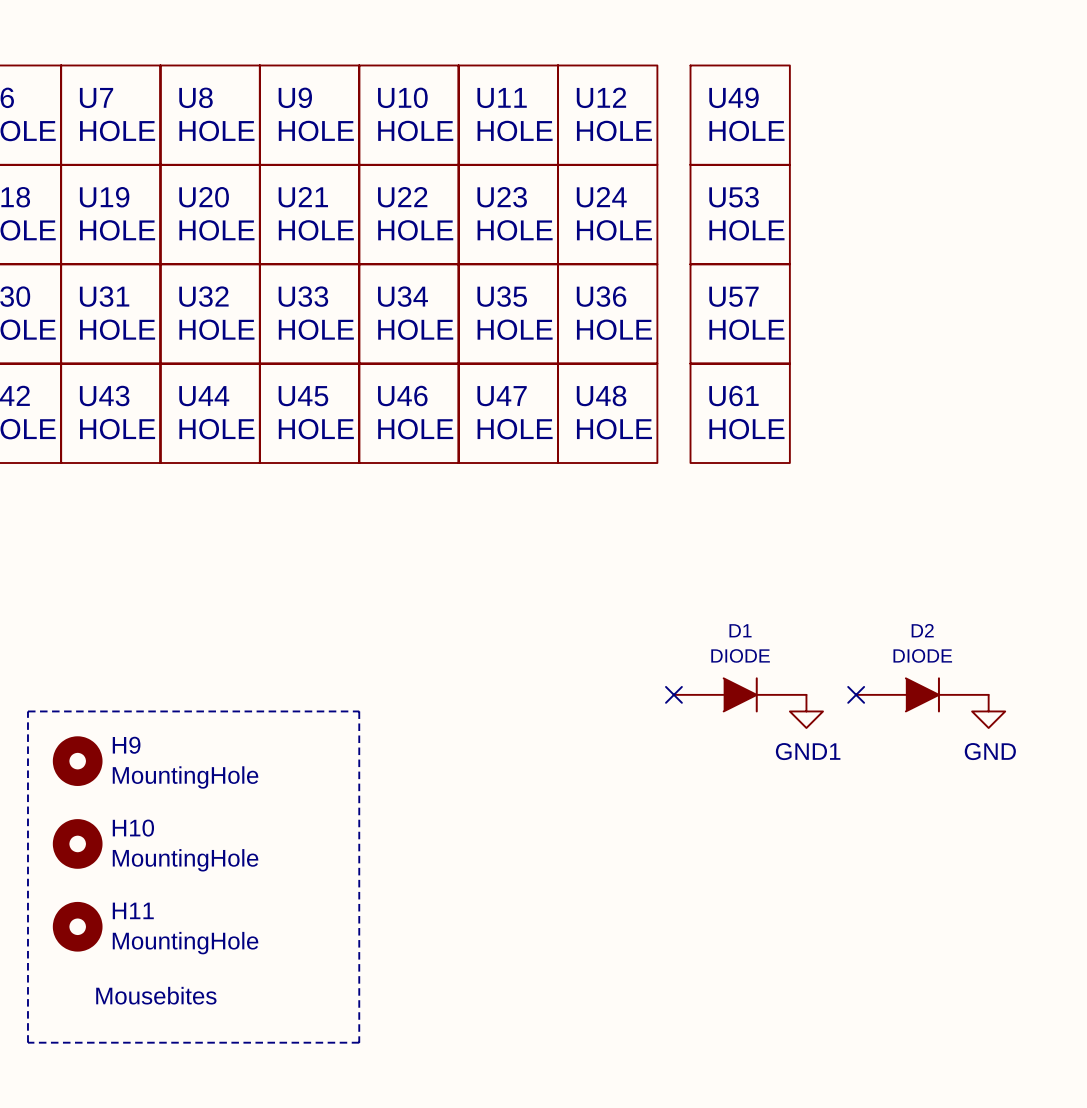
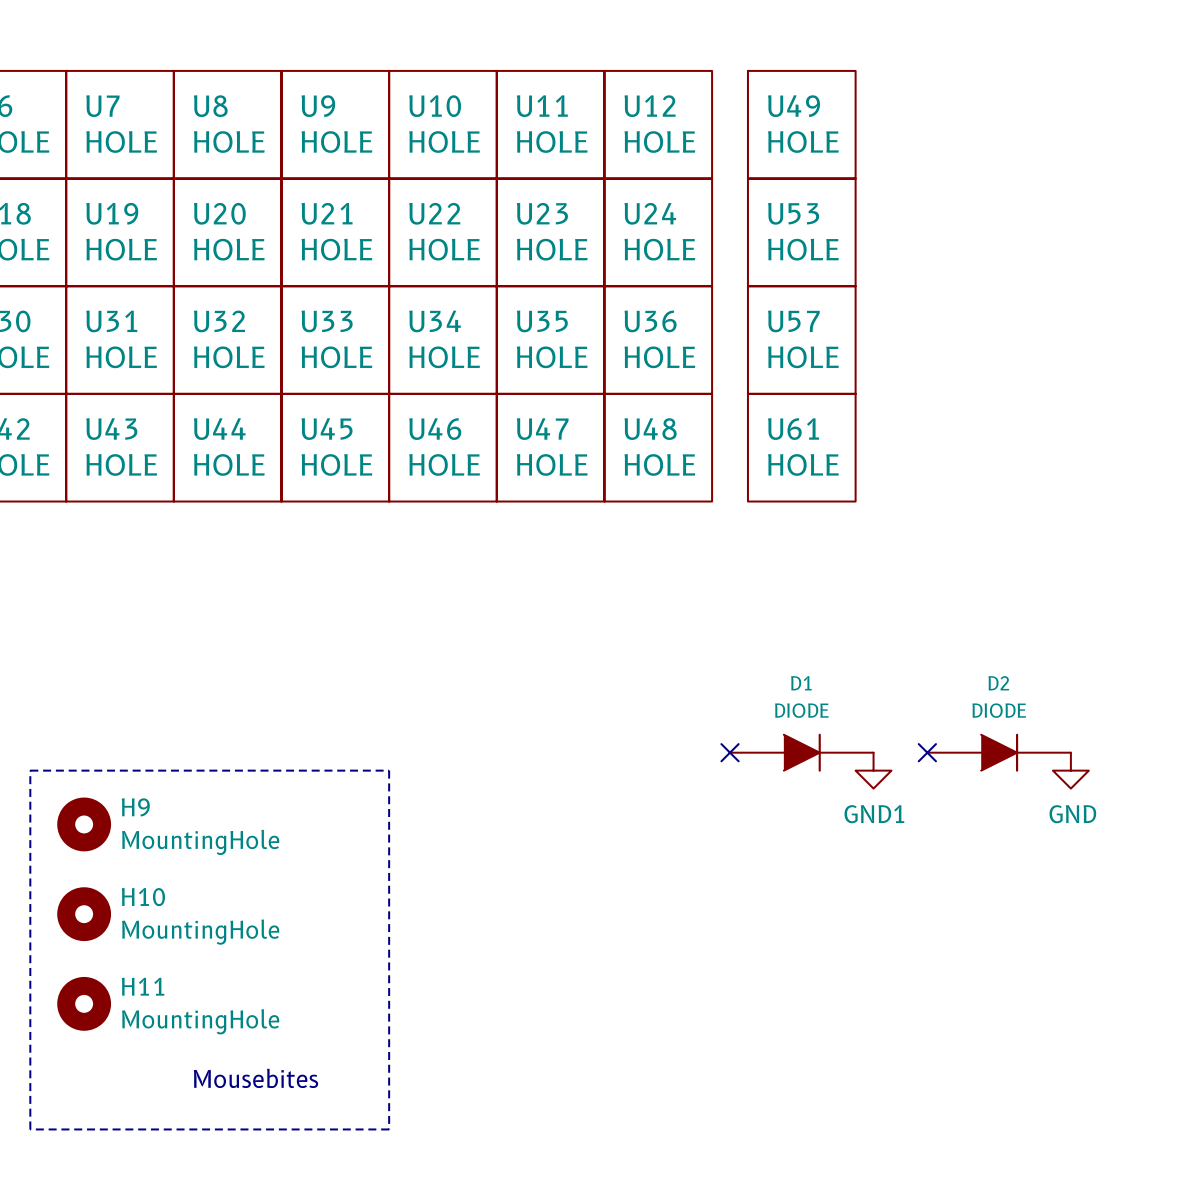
text position: Mousebites (156, 995) -> Mousebites (255, 1078)

